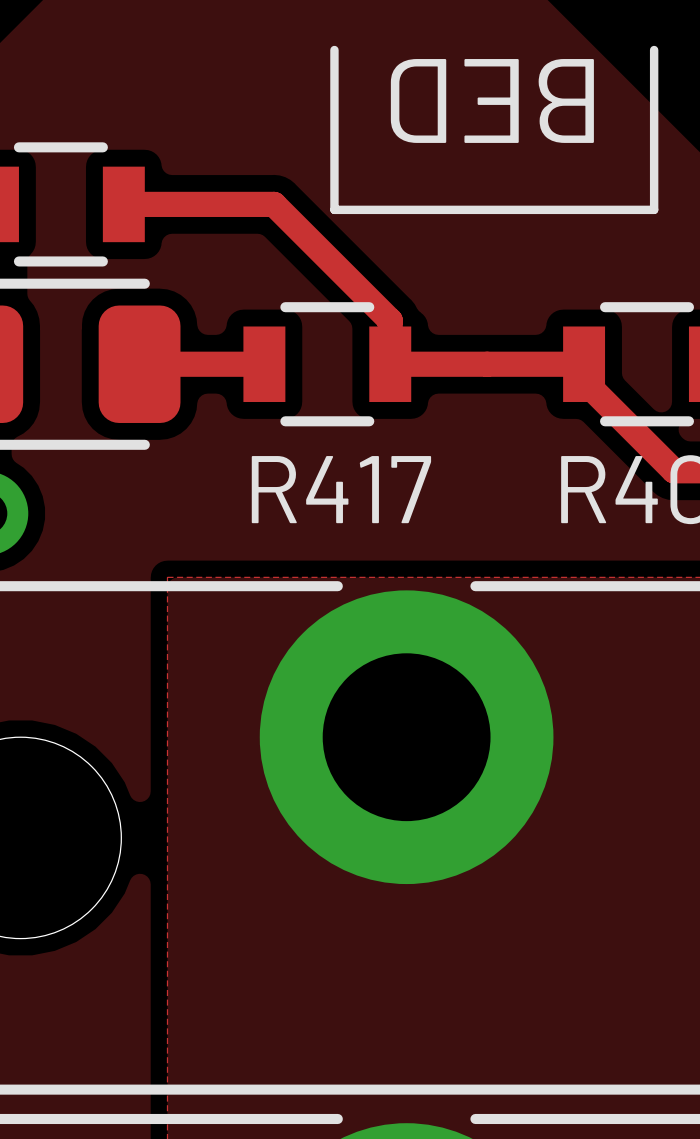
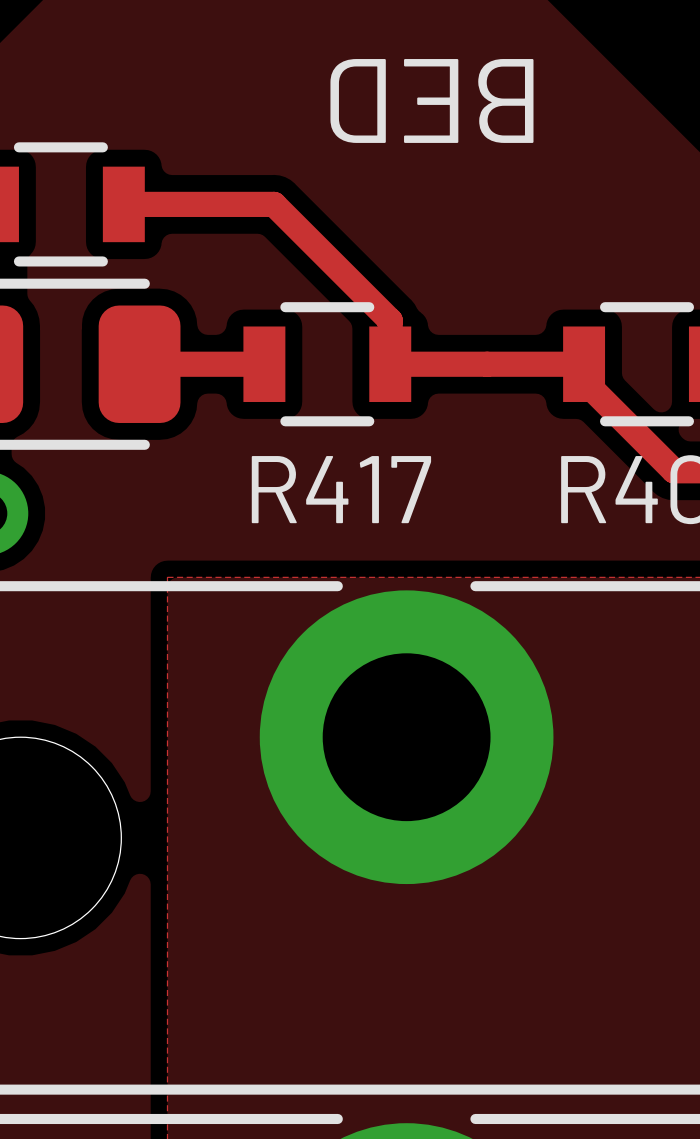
line: (334, 50) (334, 209) (654, 209) (654, 50) -> none
text position: BED (492, 100) -> BED (431, 100)

